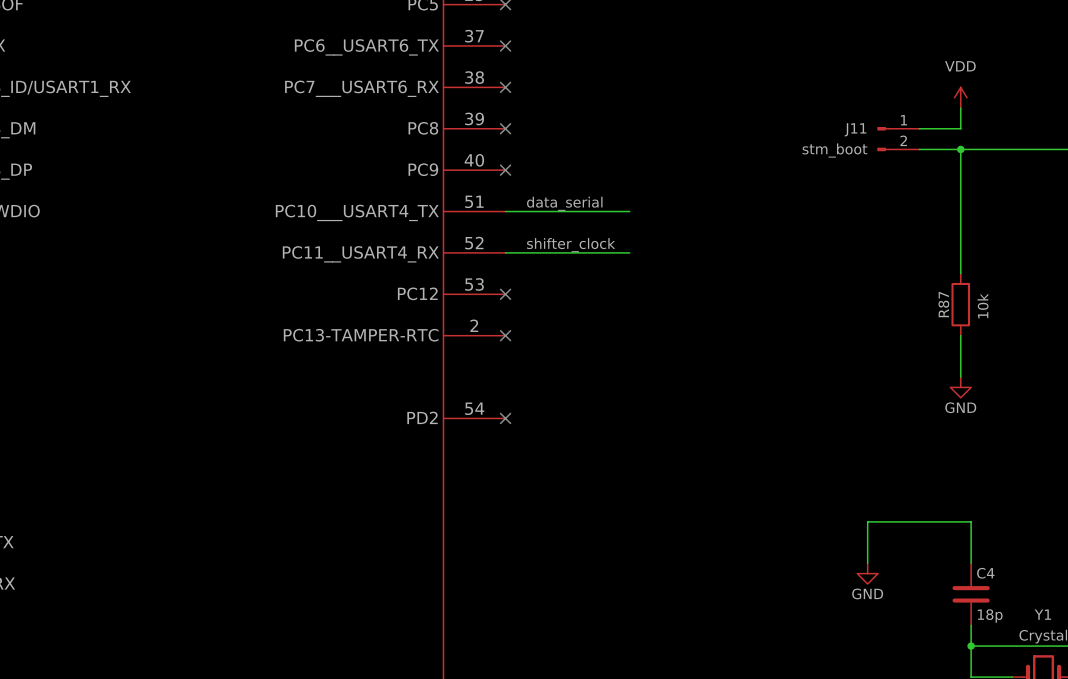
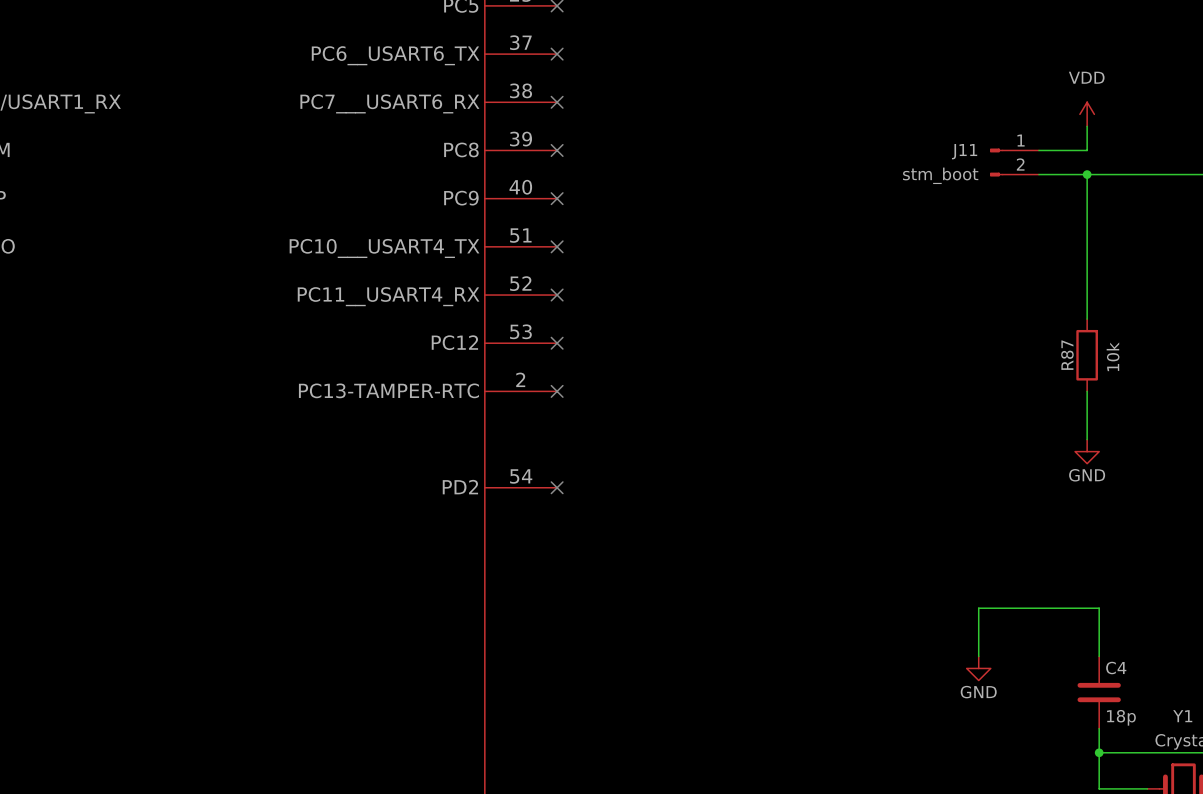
label: data_serial (564, 203) -> none
wire: (505, 211) (629, 211) -> none
no-connect mark: none -> (557, 246)
label: shifter_clock (571, 245) -> none
wire: (505, 252) (629, 252) -> none
no-connect mark: none -> (557, 295)

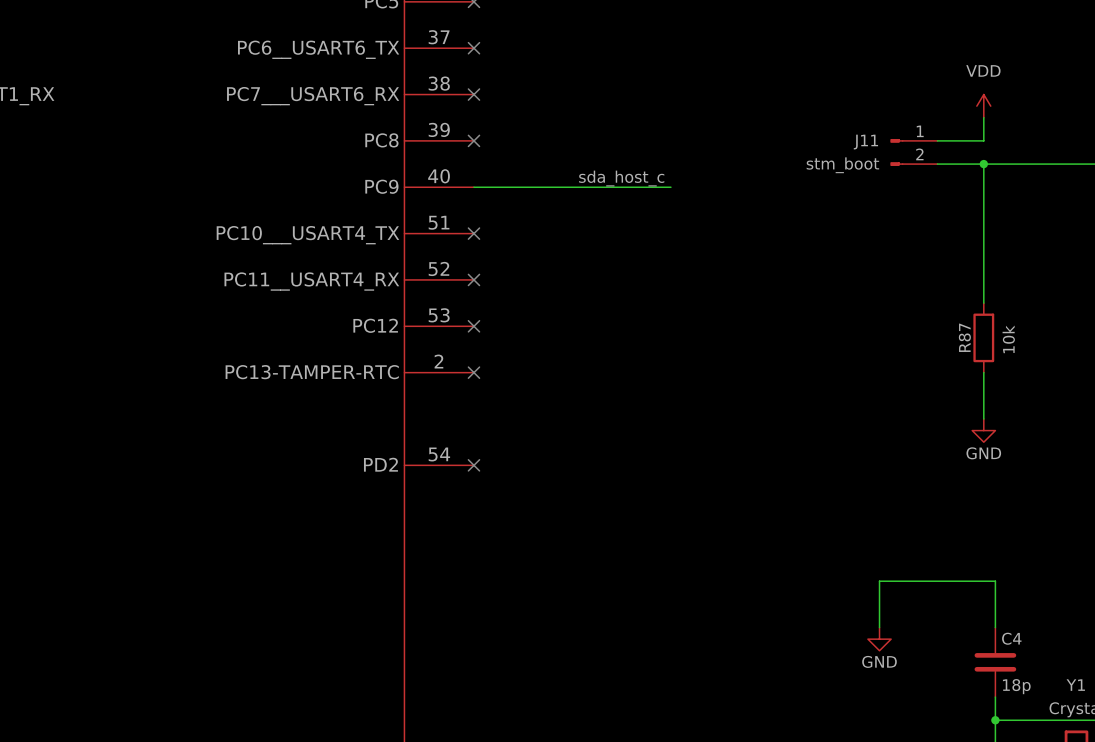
label: none -> sda_host_c (621, 178)
wire: none -> (473, 187) (670, 187)
no-connect mark: (557, 198) -> none

